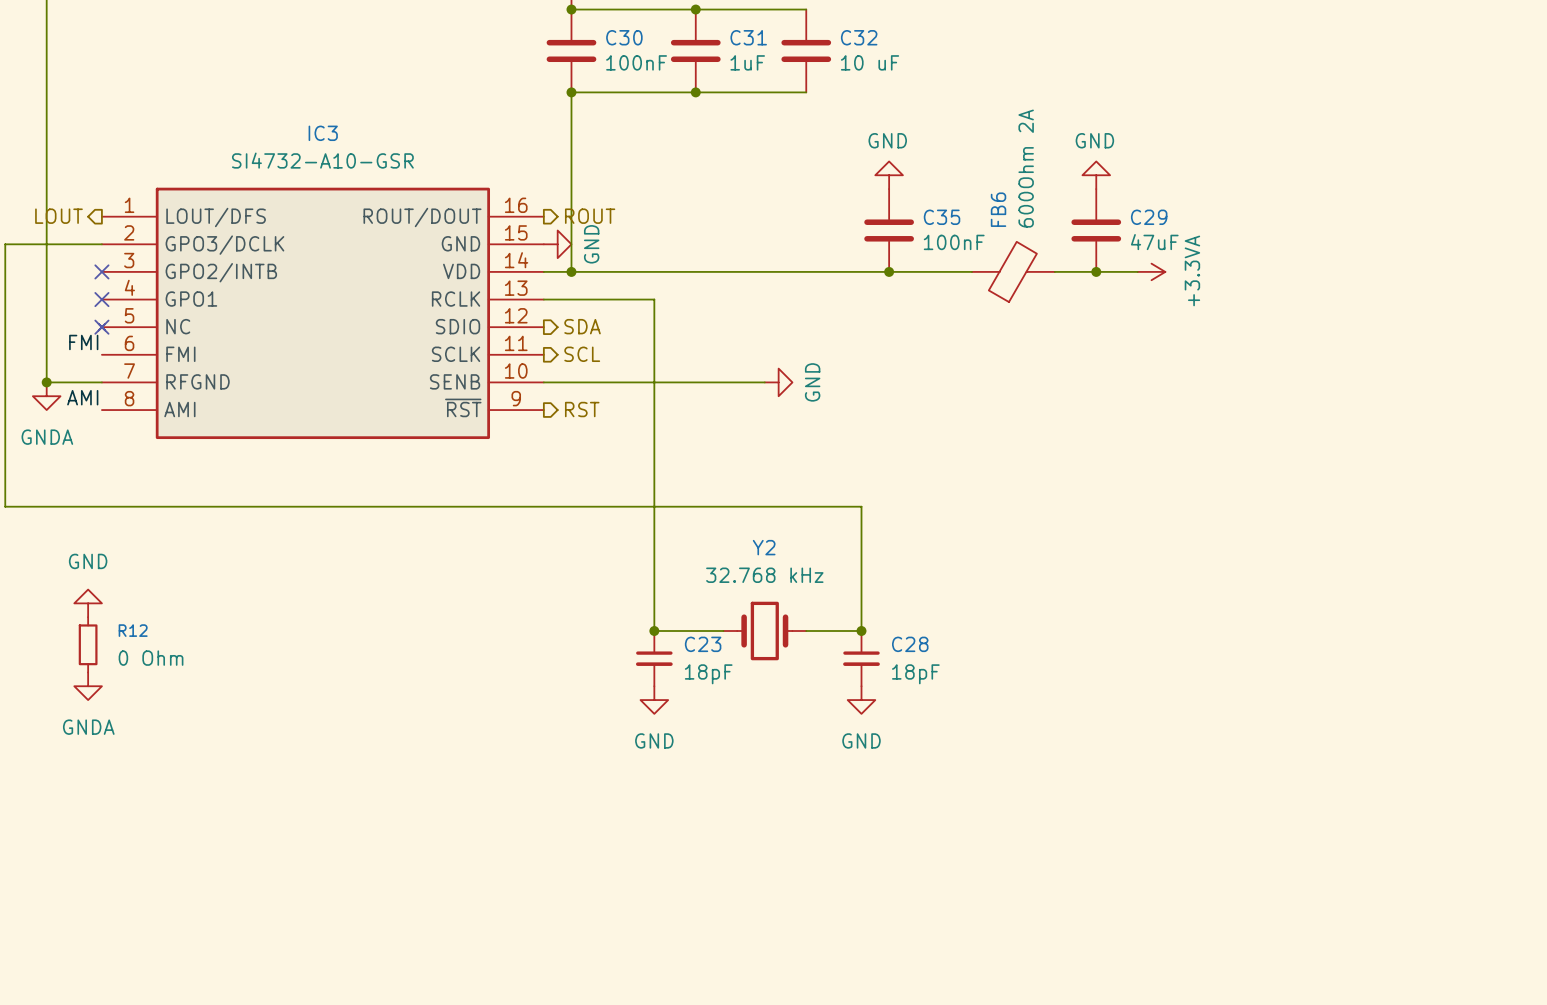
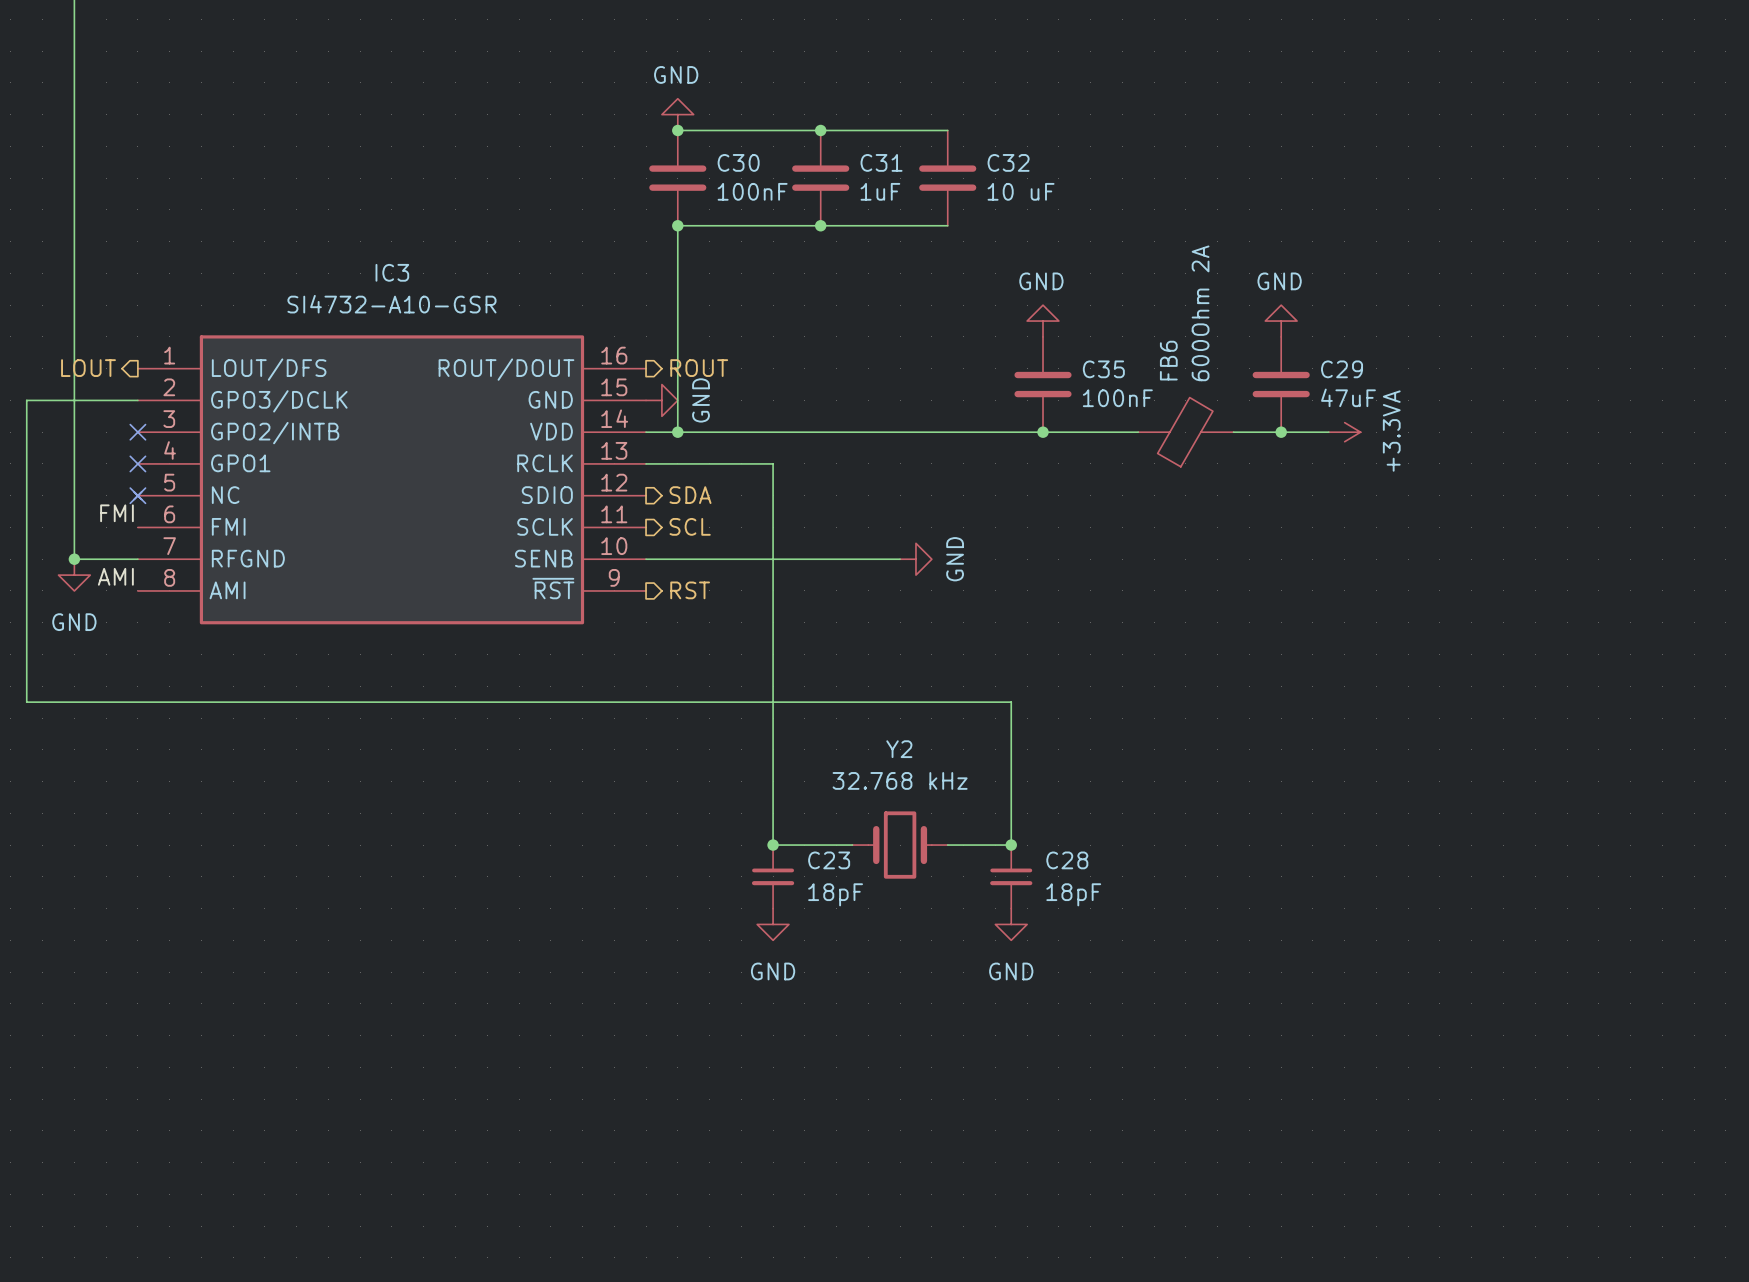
power symbol: GNDA (46, 396) -> GND (74, 575)
power symbol: GND (88, 603) -> none
R12: 0 Ohm (88, 644) -> none
power symbol: GNDA (88, 686) -> none

